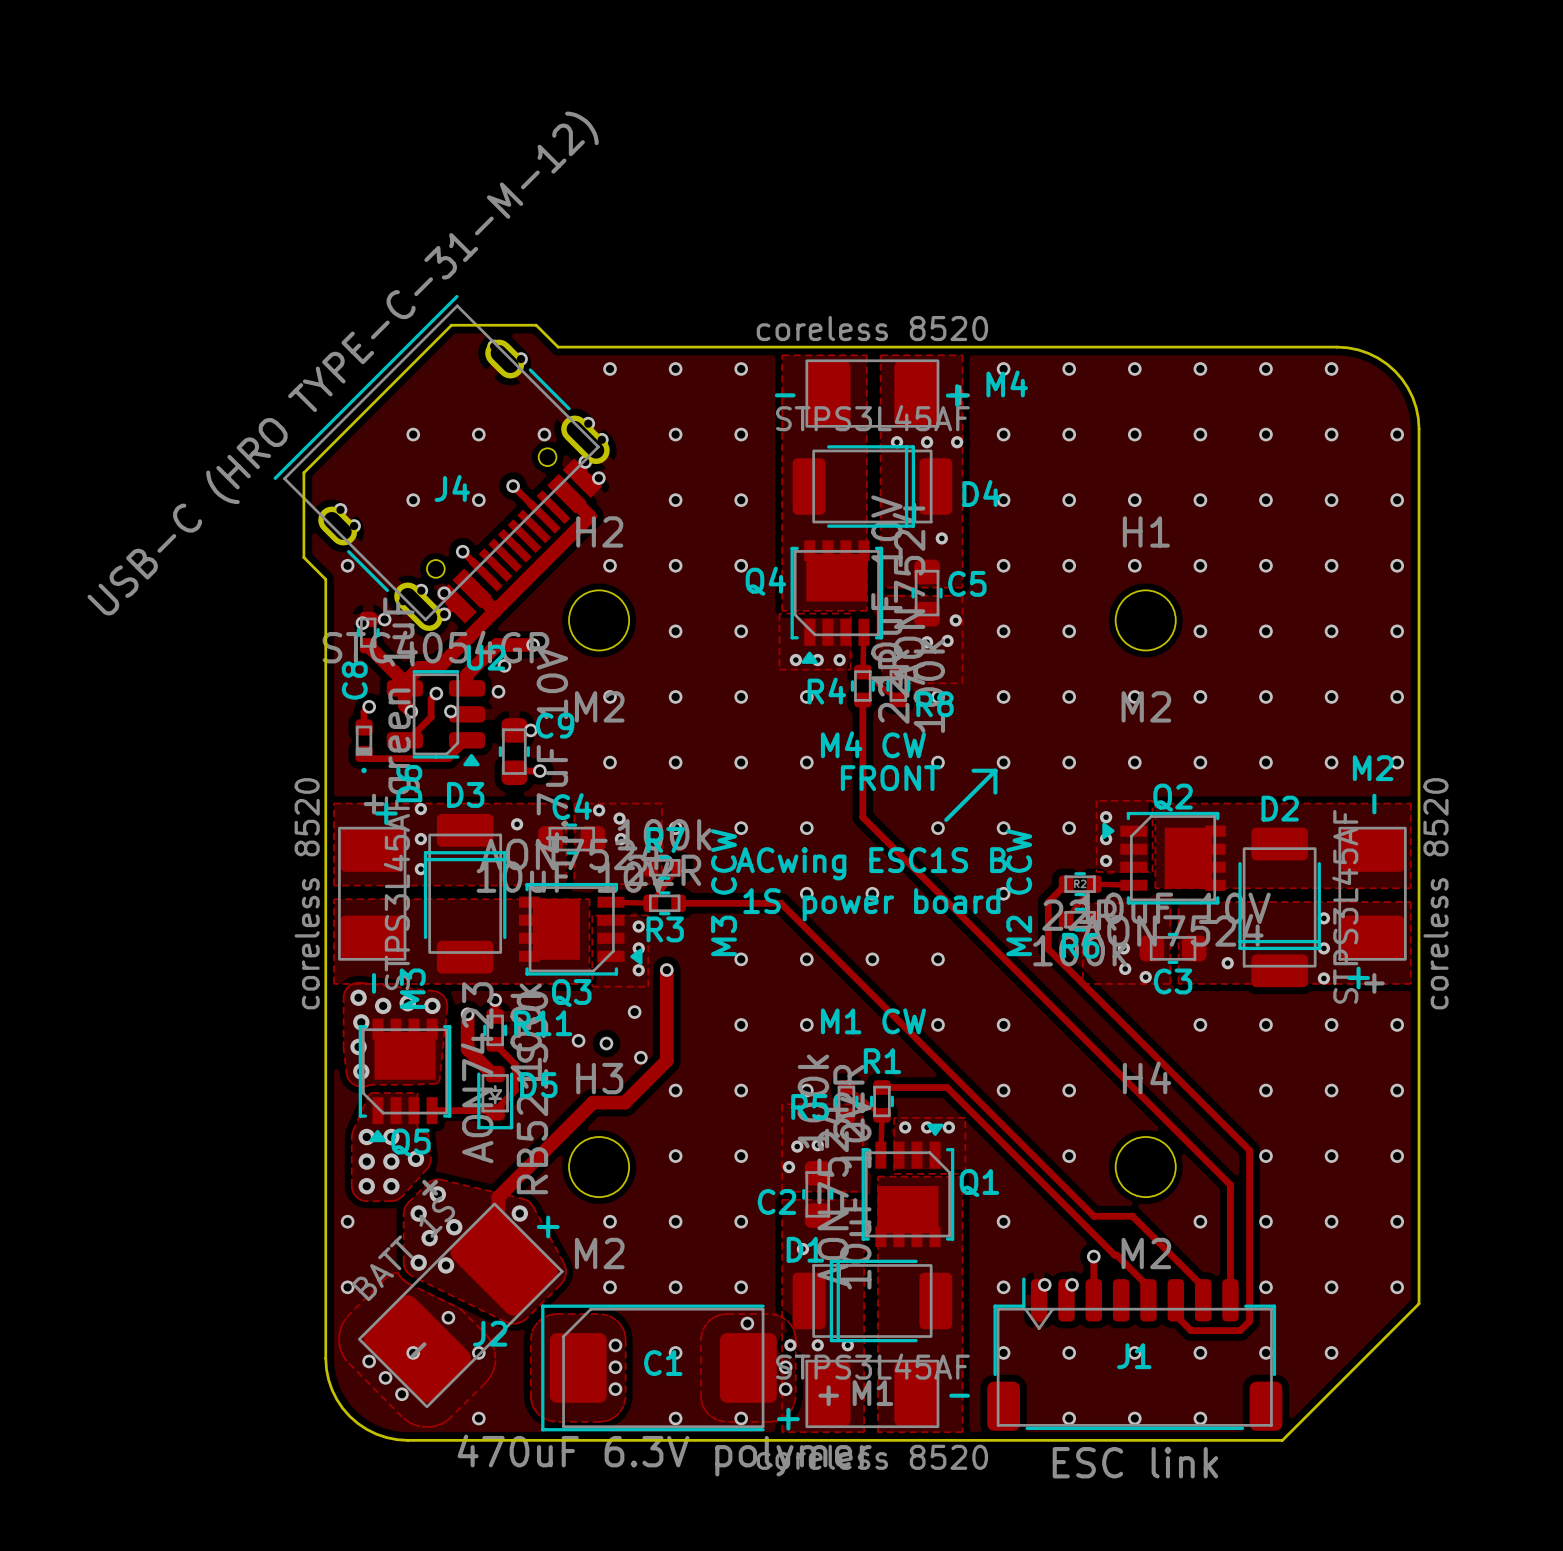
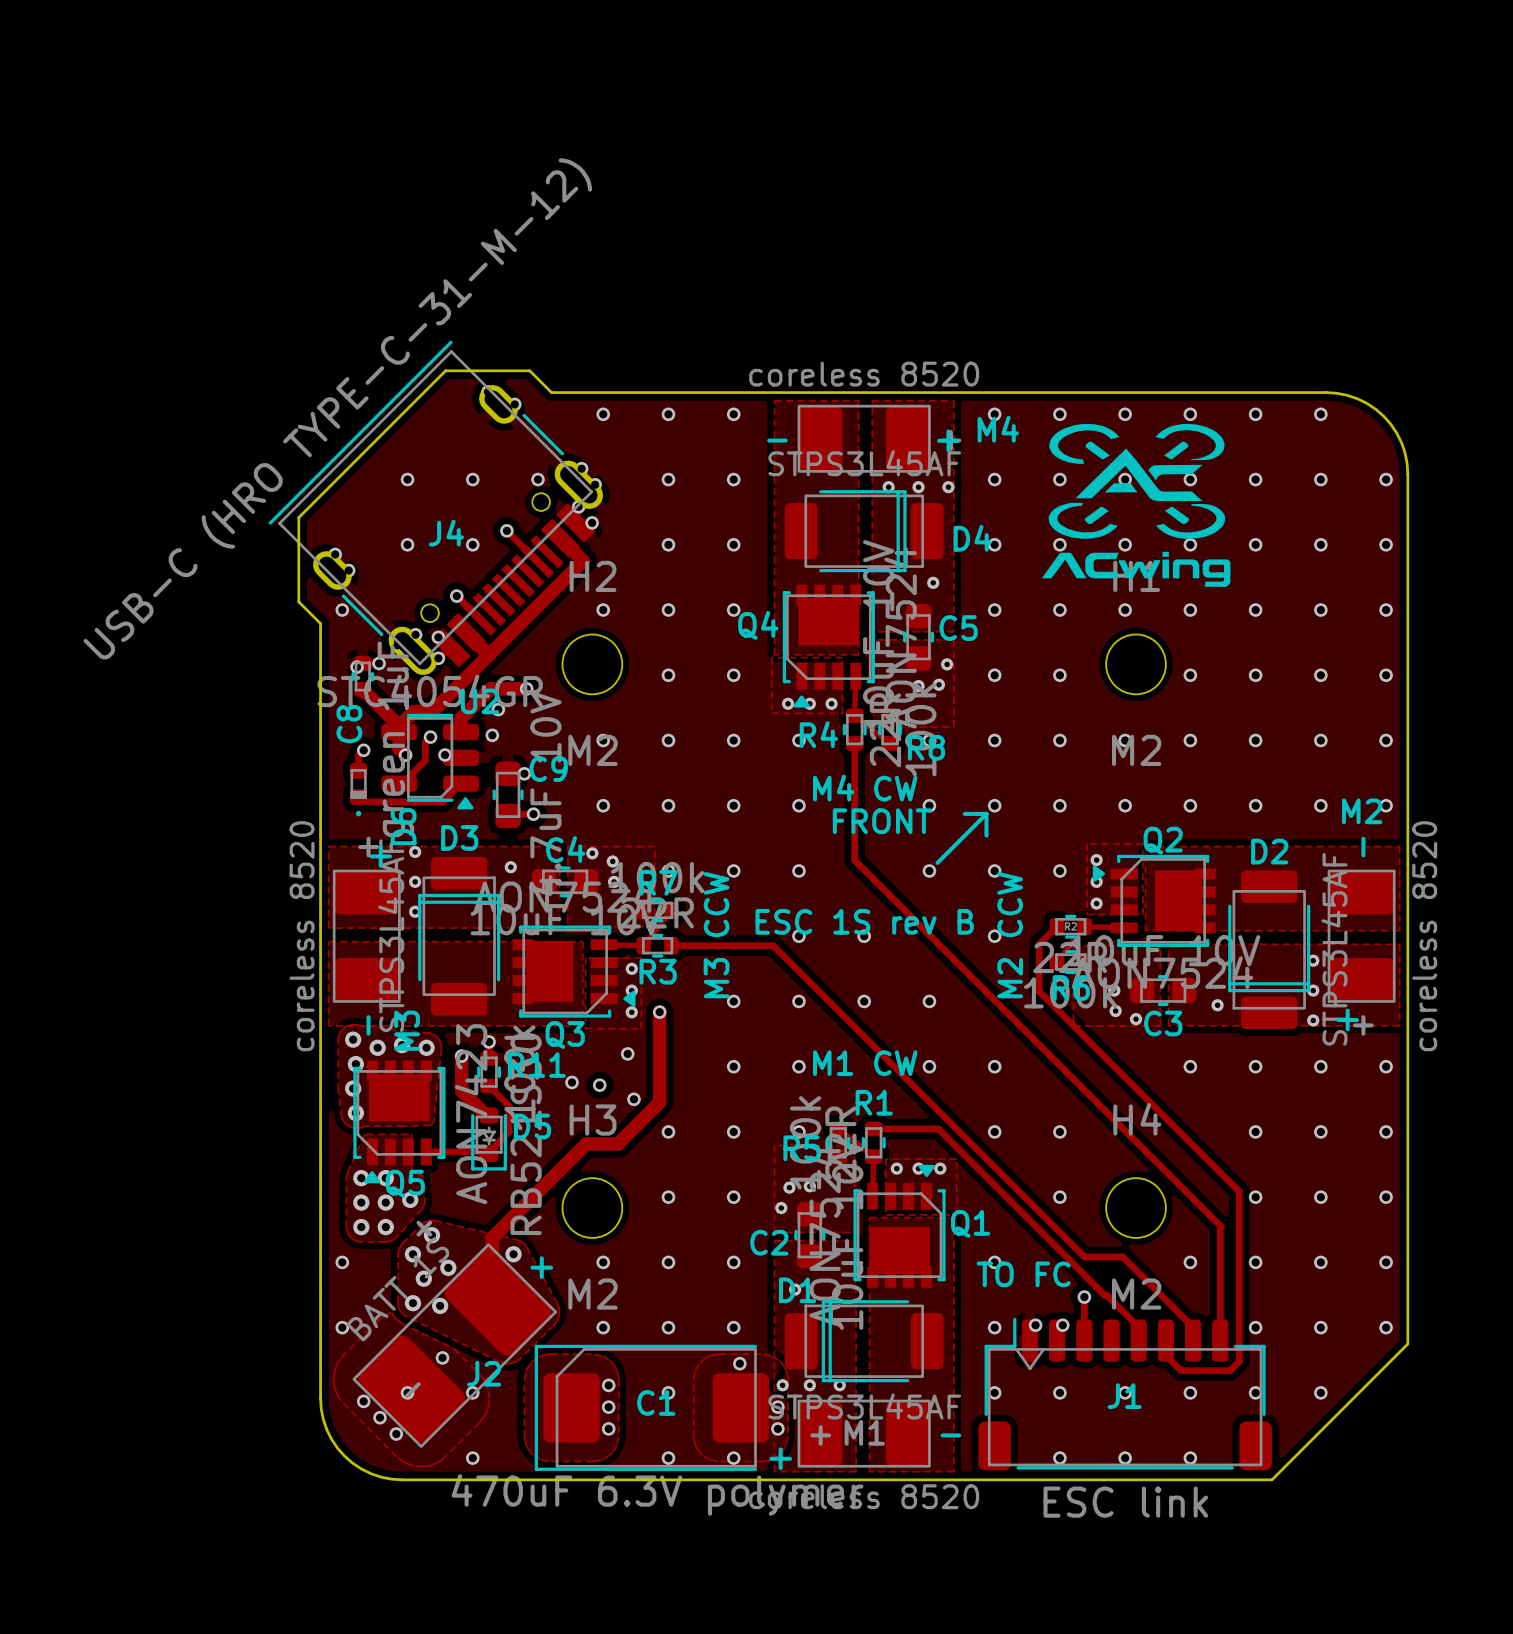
drawing: none -> [1042, 423, 1231, 587]
text: ACwing ESC1S B (871, 863) -> none
text: none -> ESC 1S rev B (864, 921)
text: 1S power board (871, 904) -> none
text: none -> TO FC (1023, 1274)

